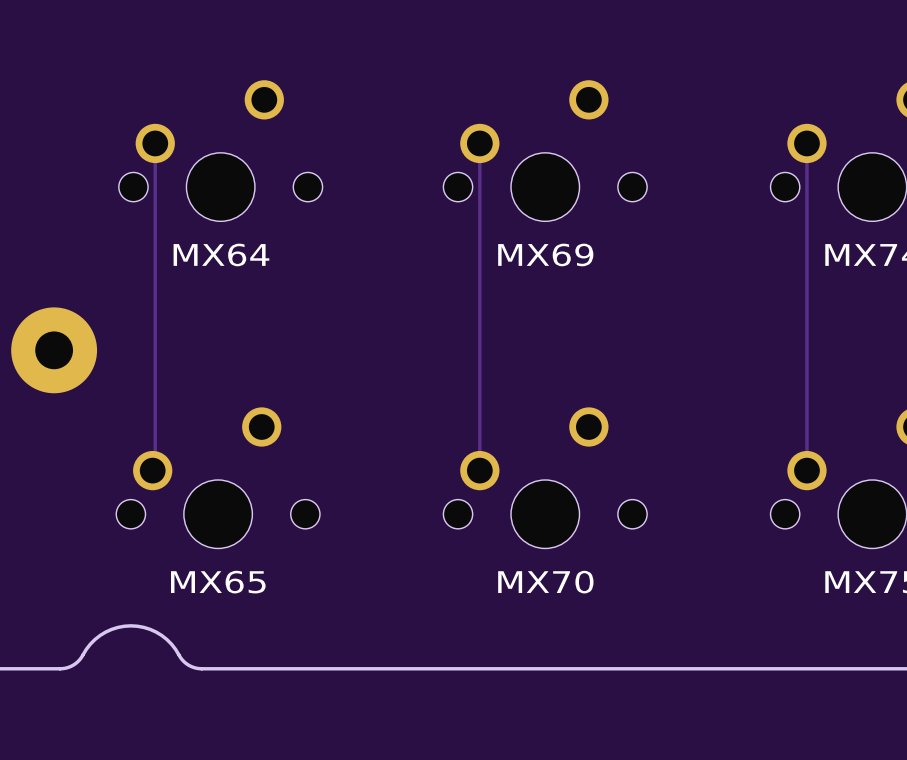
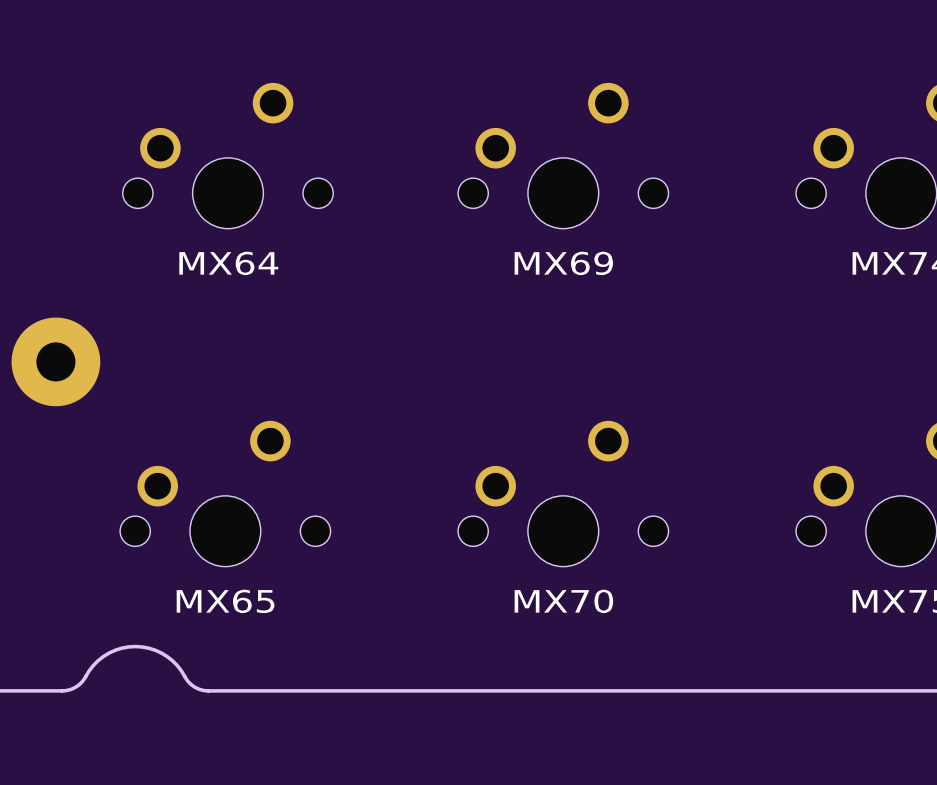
track: (155, 143) (155, 468) -> none
track: (479, 143) (479, 470) -> none
track: (806, 143) (806, 470) -> none

